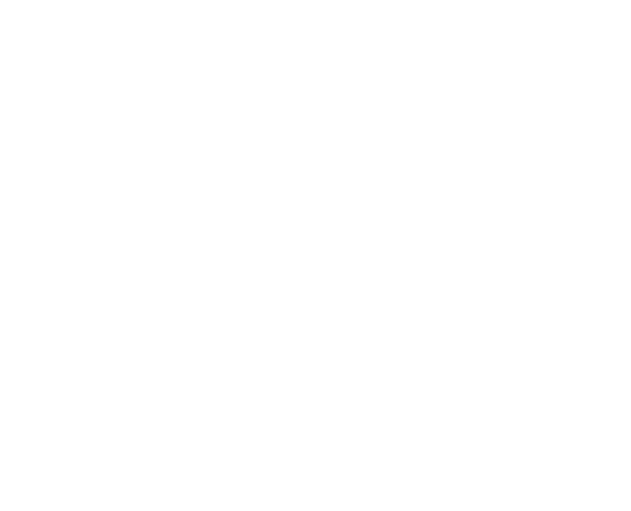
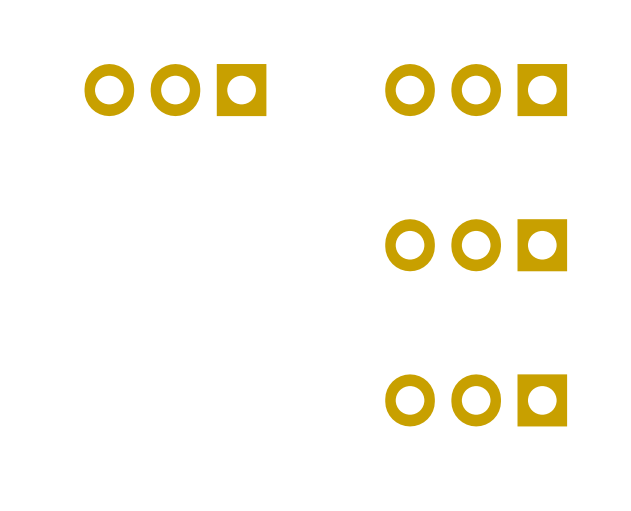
part: none -> (175, 90)
part: none -> (476, 90)
part: none -> (476, 245)
part: none -> (476, 400)

